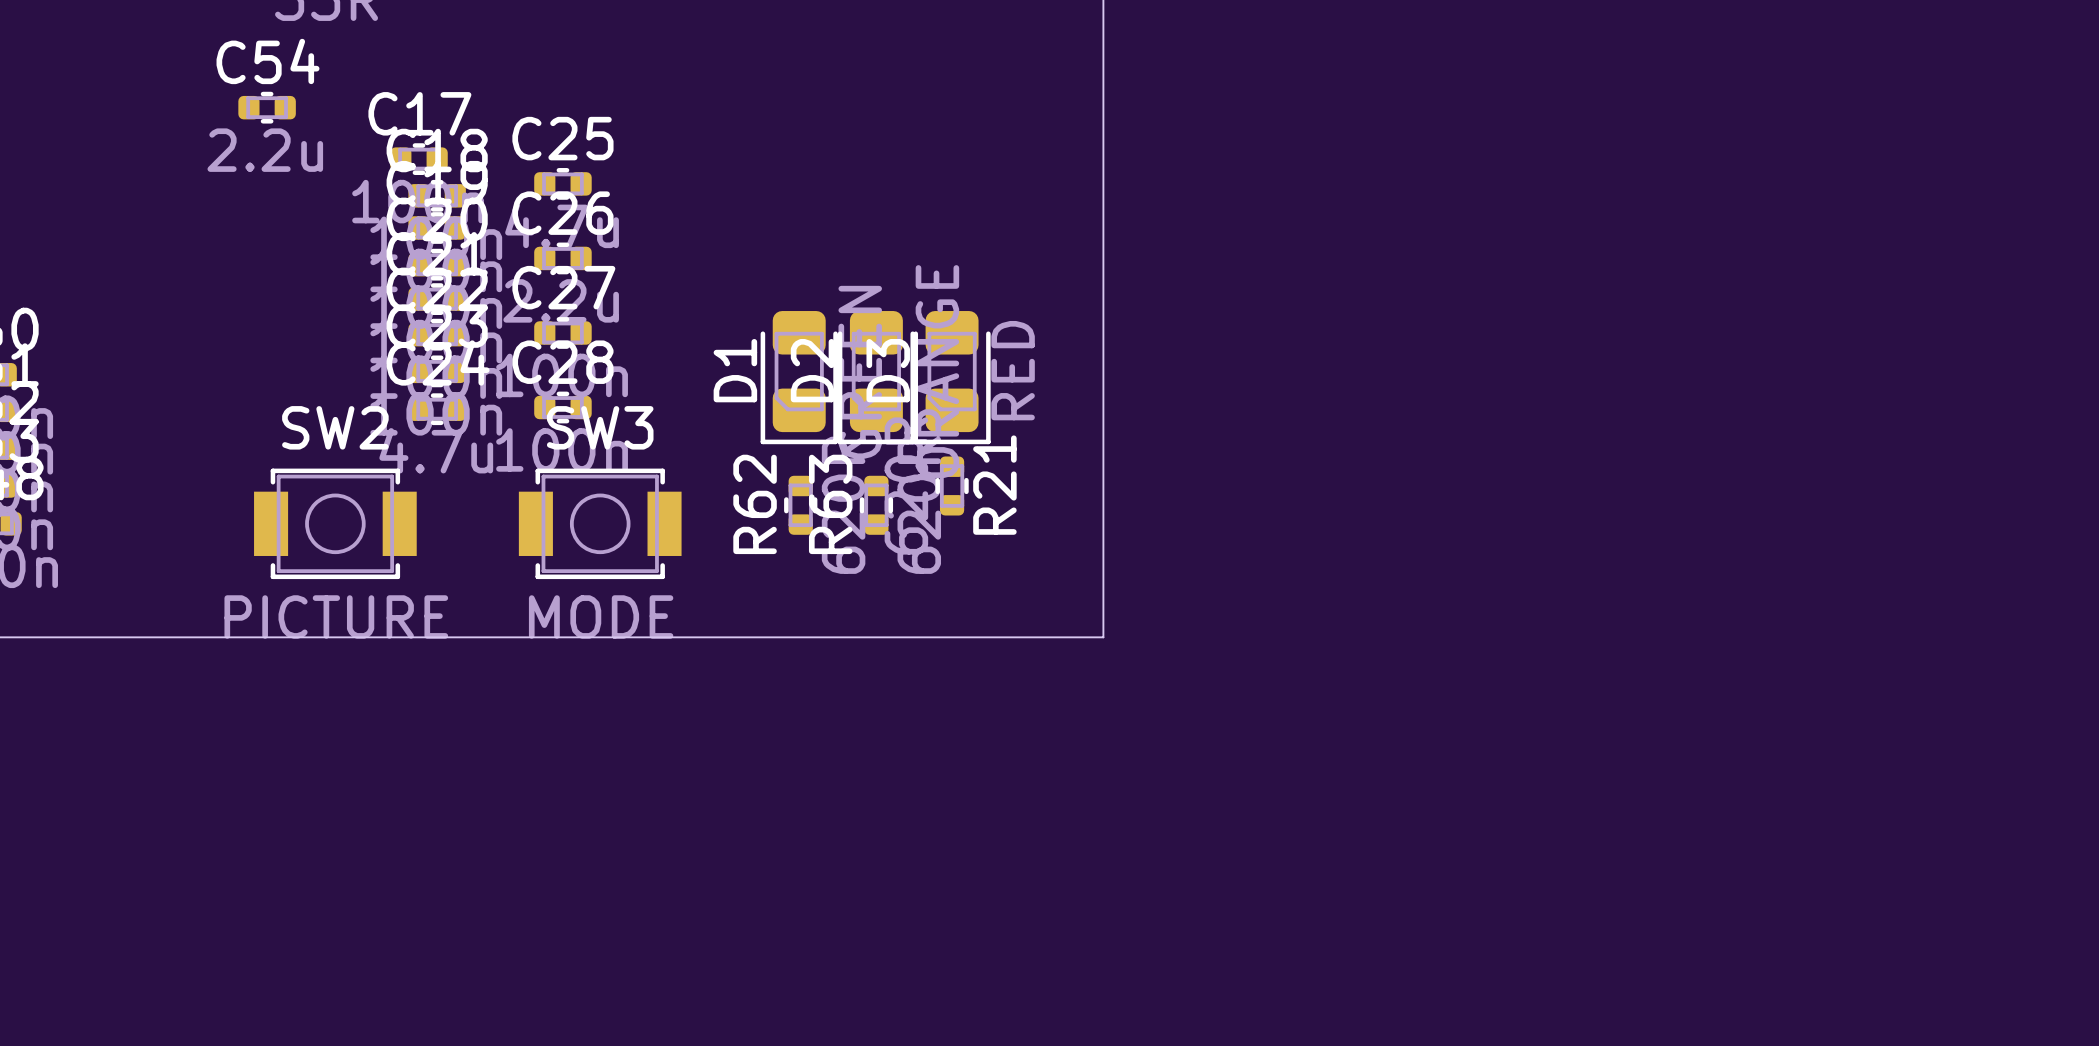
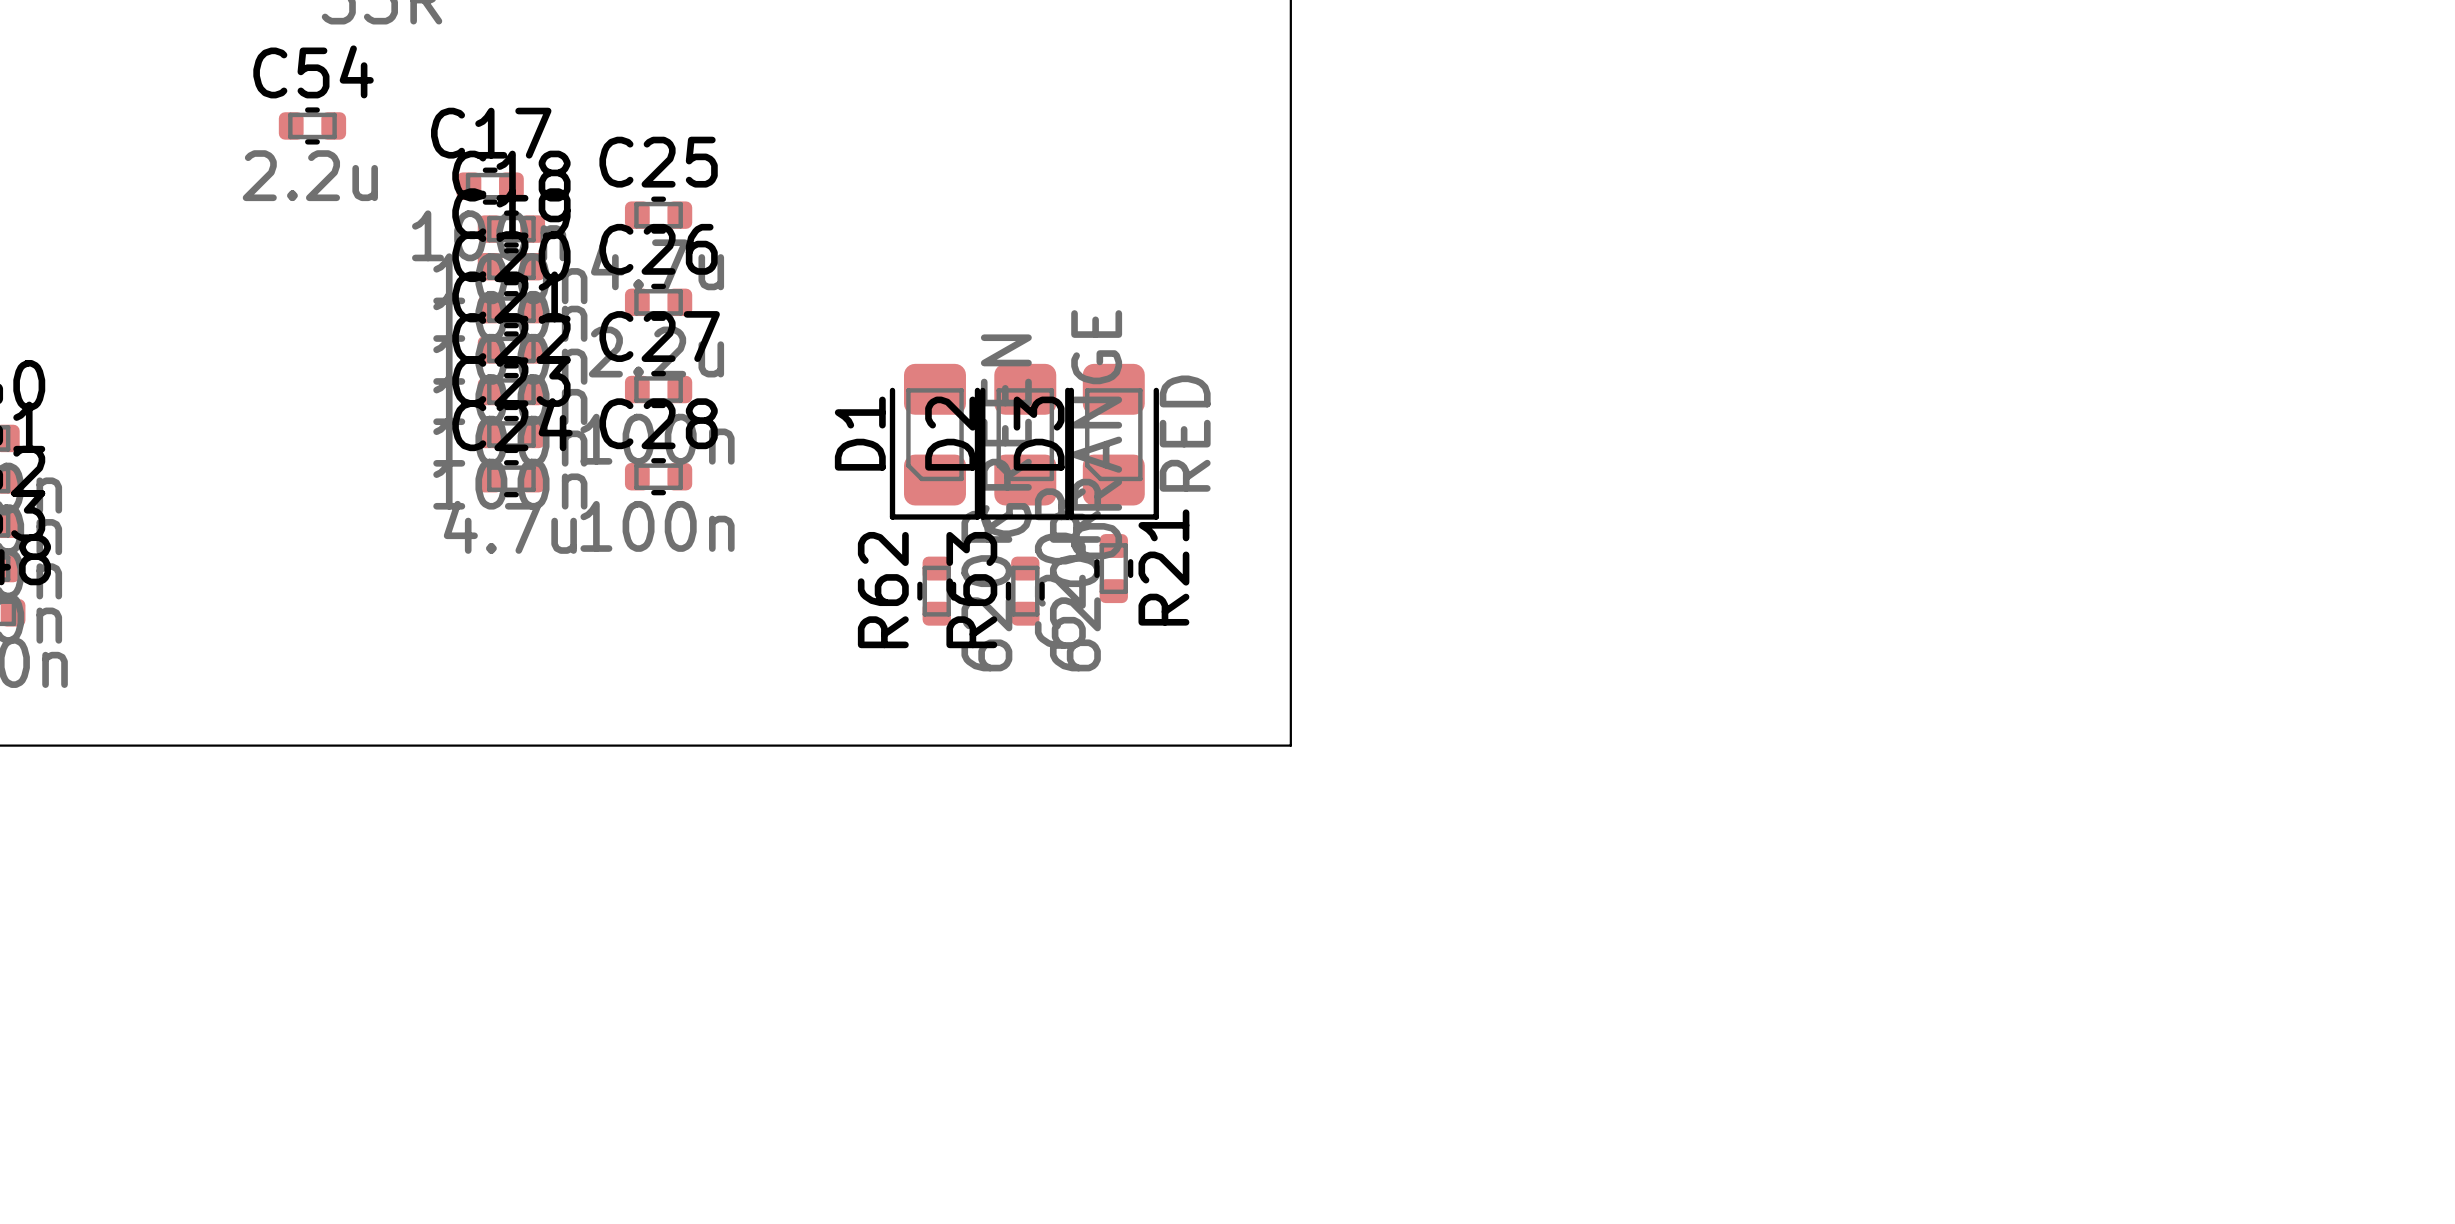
SW2: PICTURE (335, 523) -> none
SW3: MODE (600, 523) -> none

